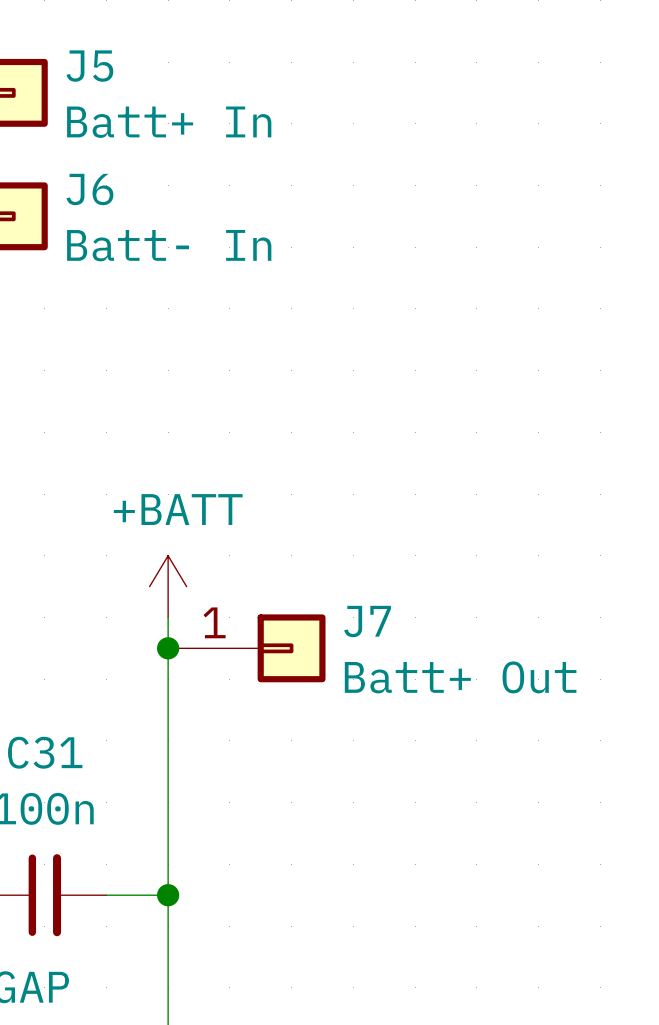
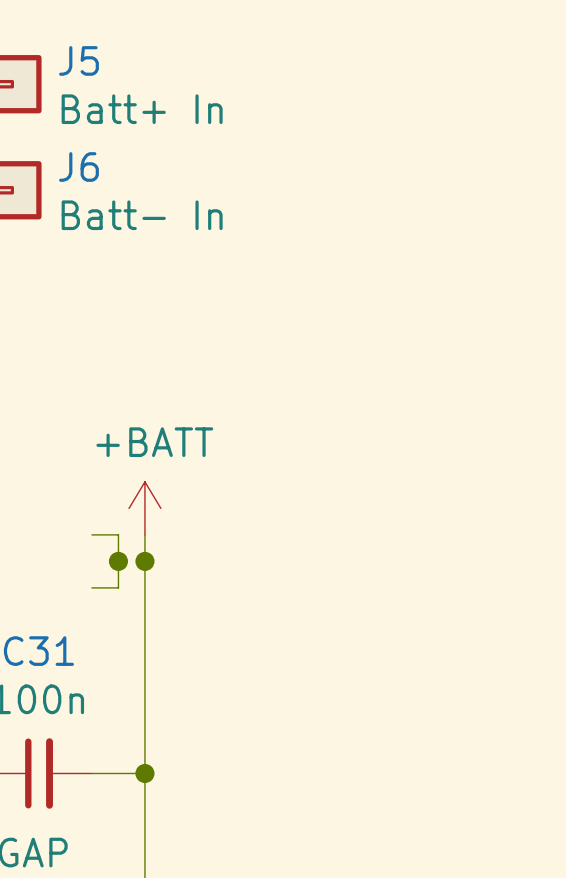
wire: none -> (91, 534) (118, 534) (118, 587) (91, 587)
junction: none -> (118, 561)
J7: Batt+ Out (246, 648) -> none

